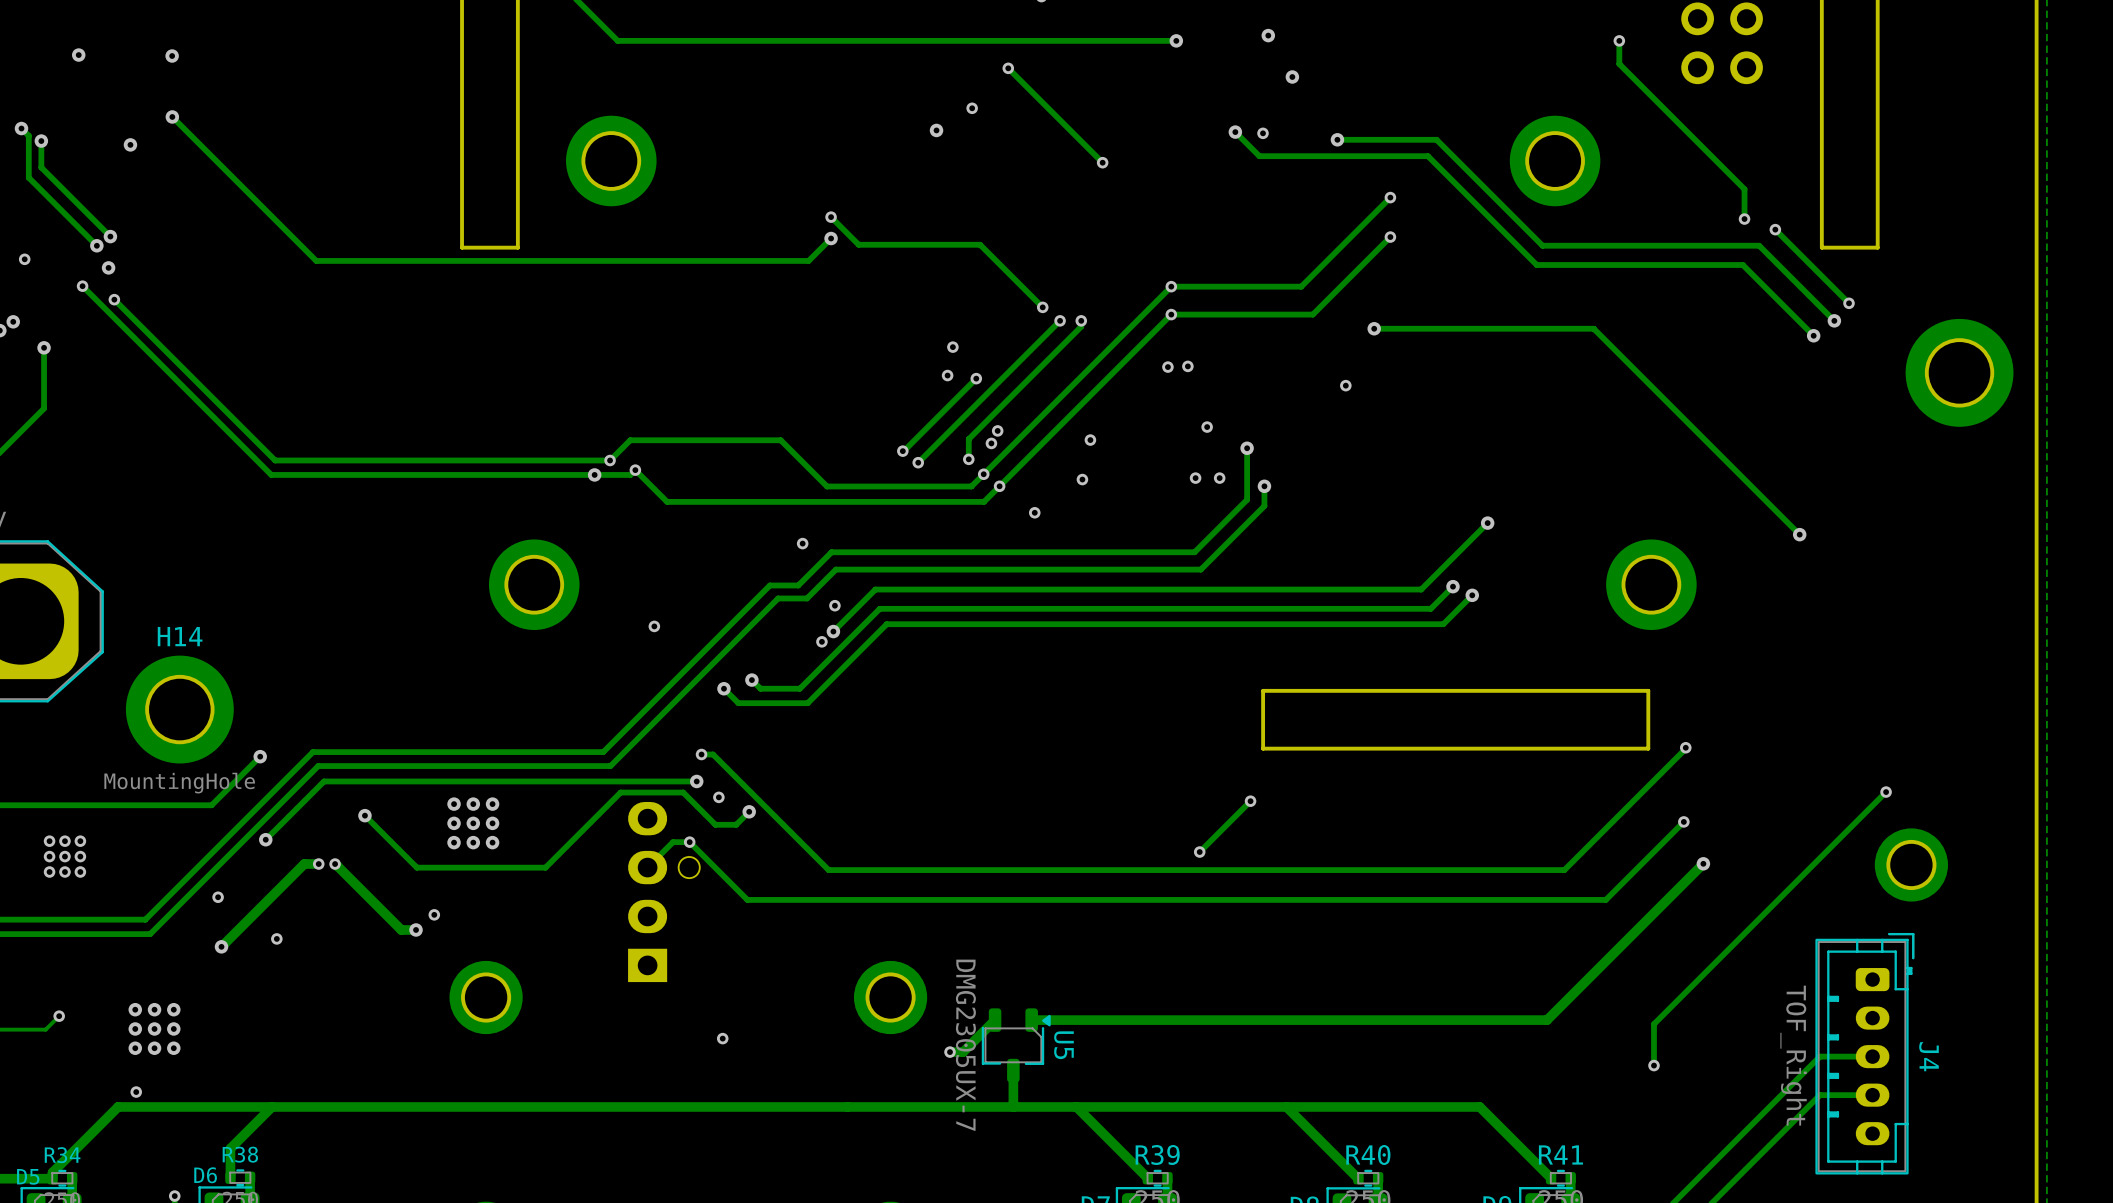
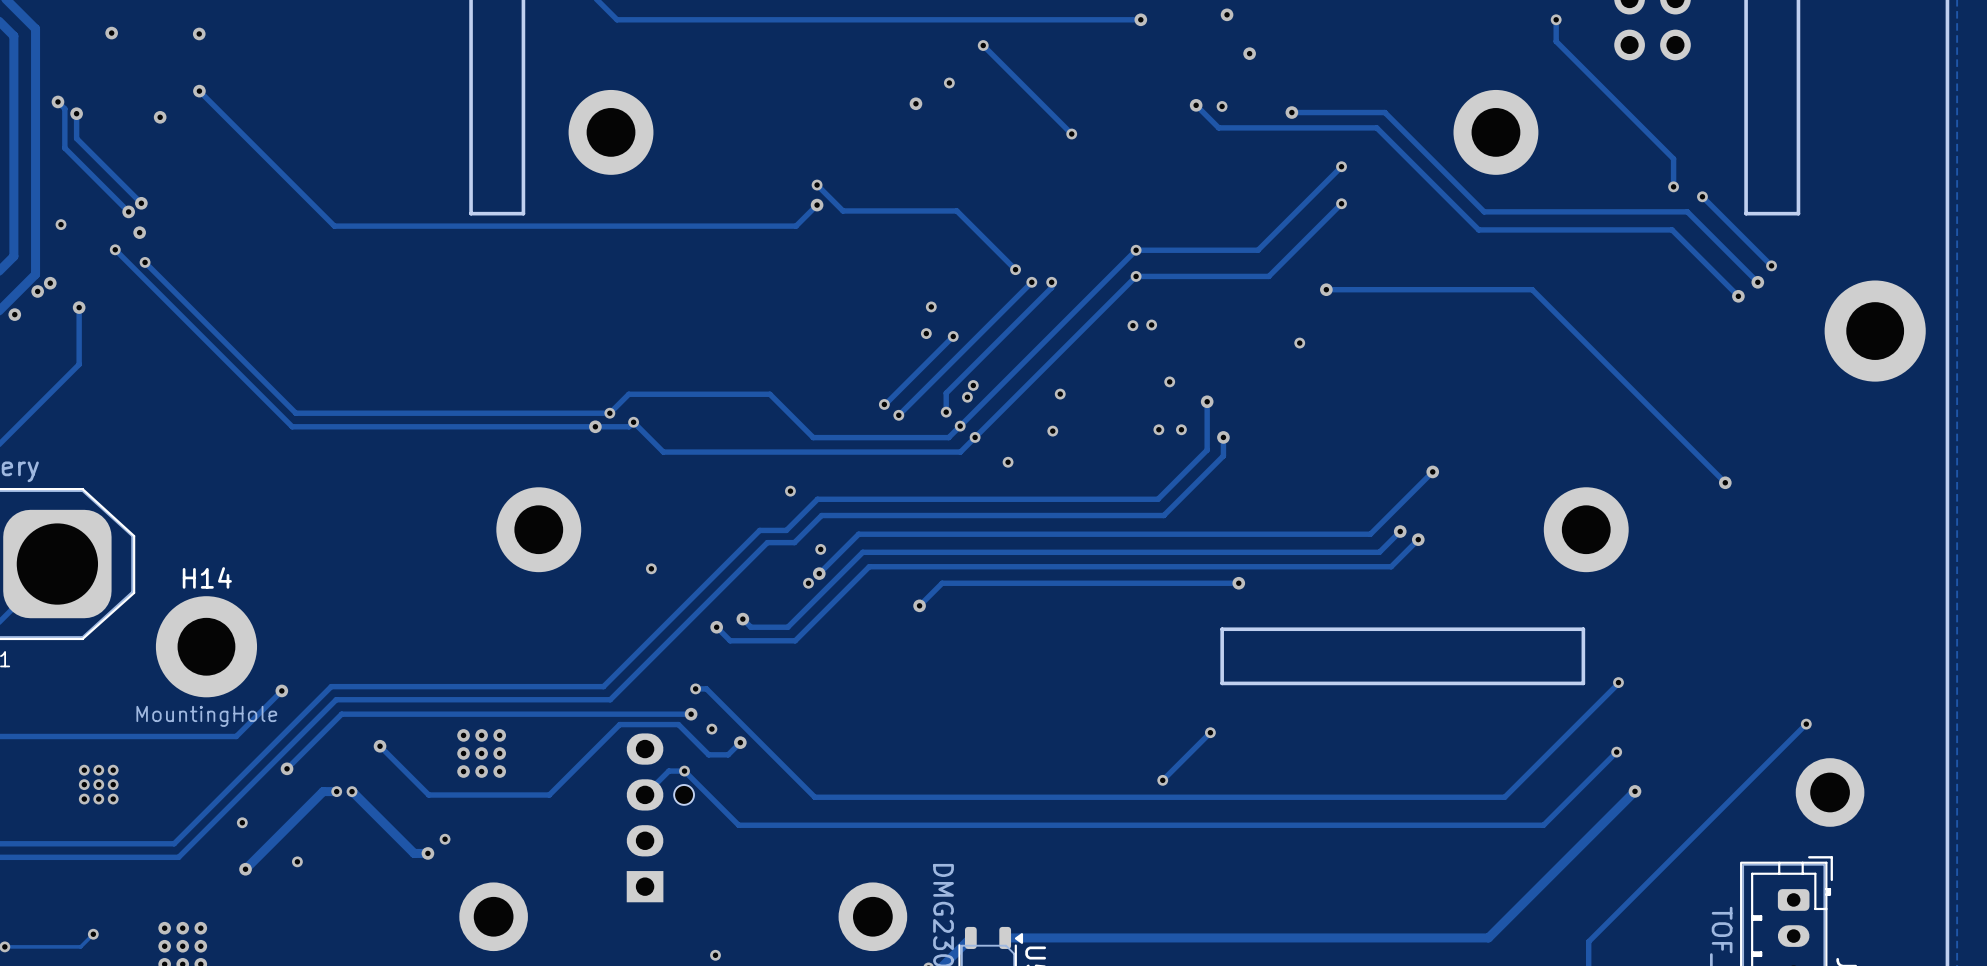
track: none -> (1238, 583) (942, 583) (919, 605)
via: none -> (1238, 583)
via: none -> (919, 605)

